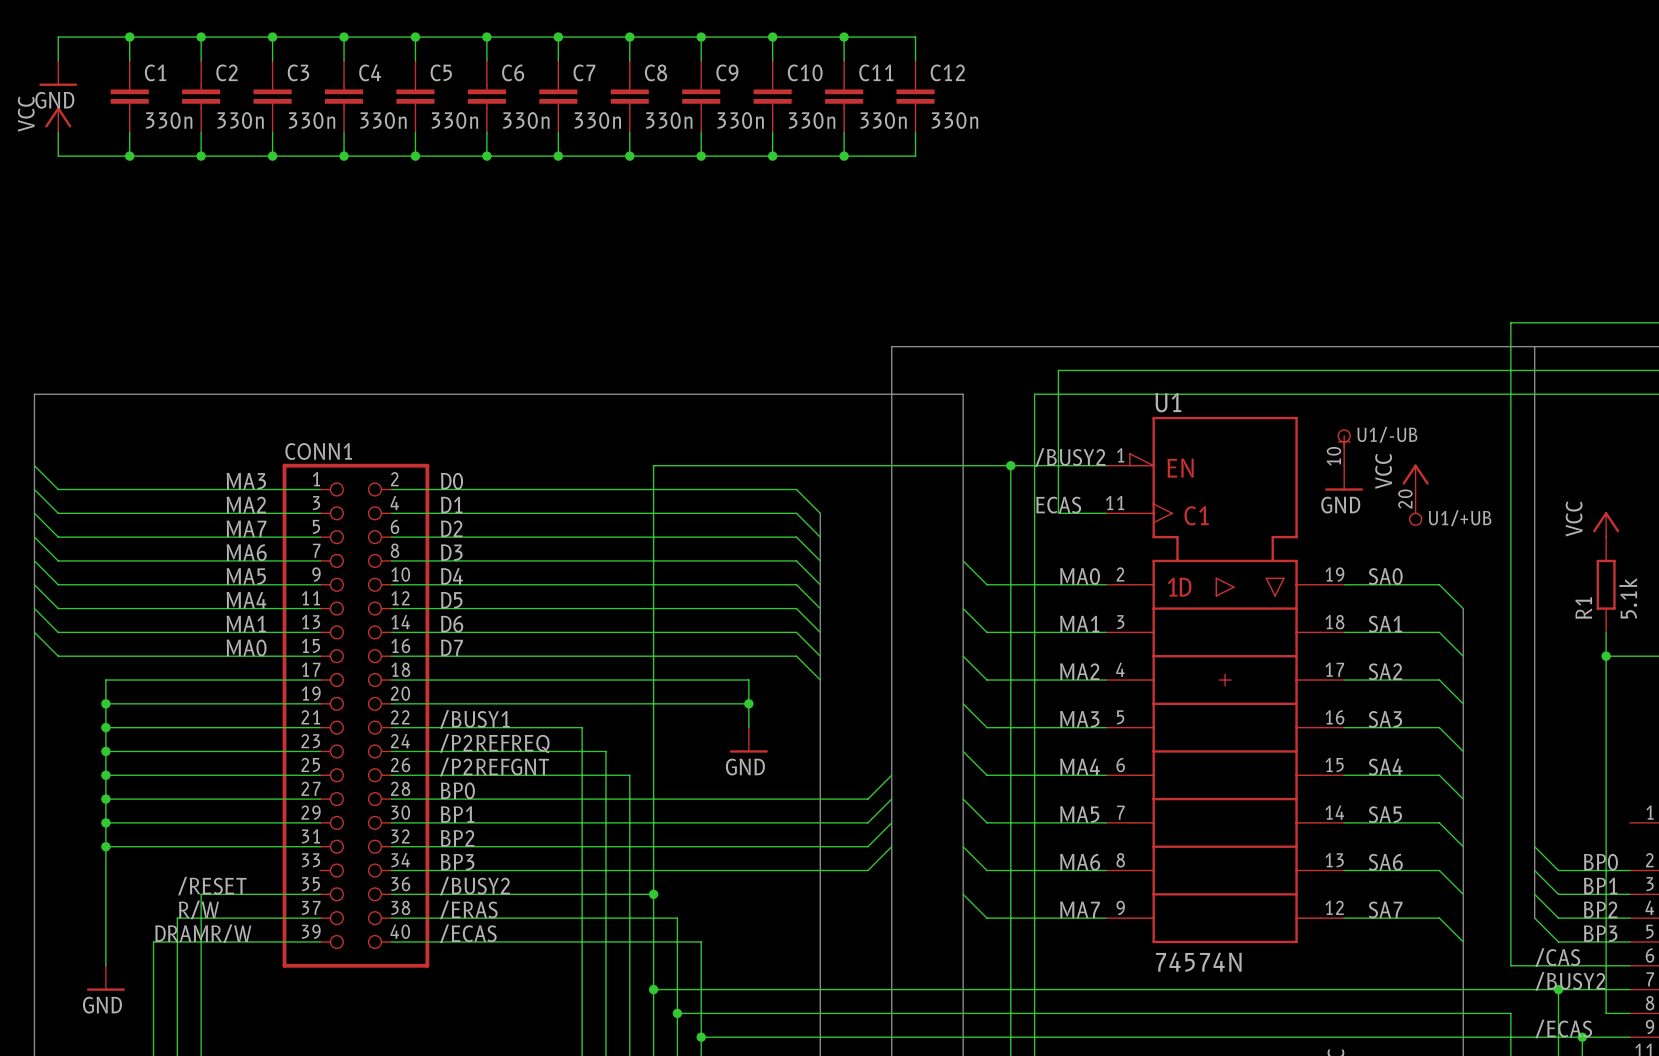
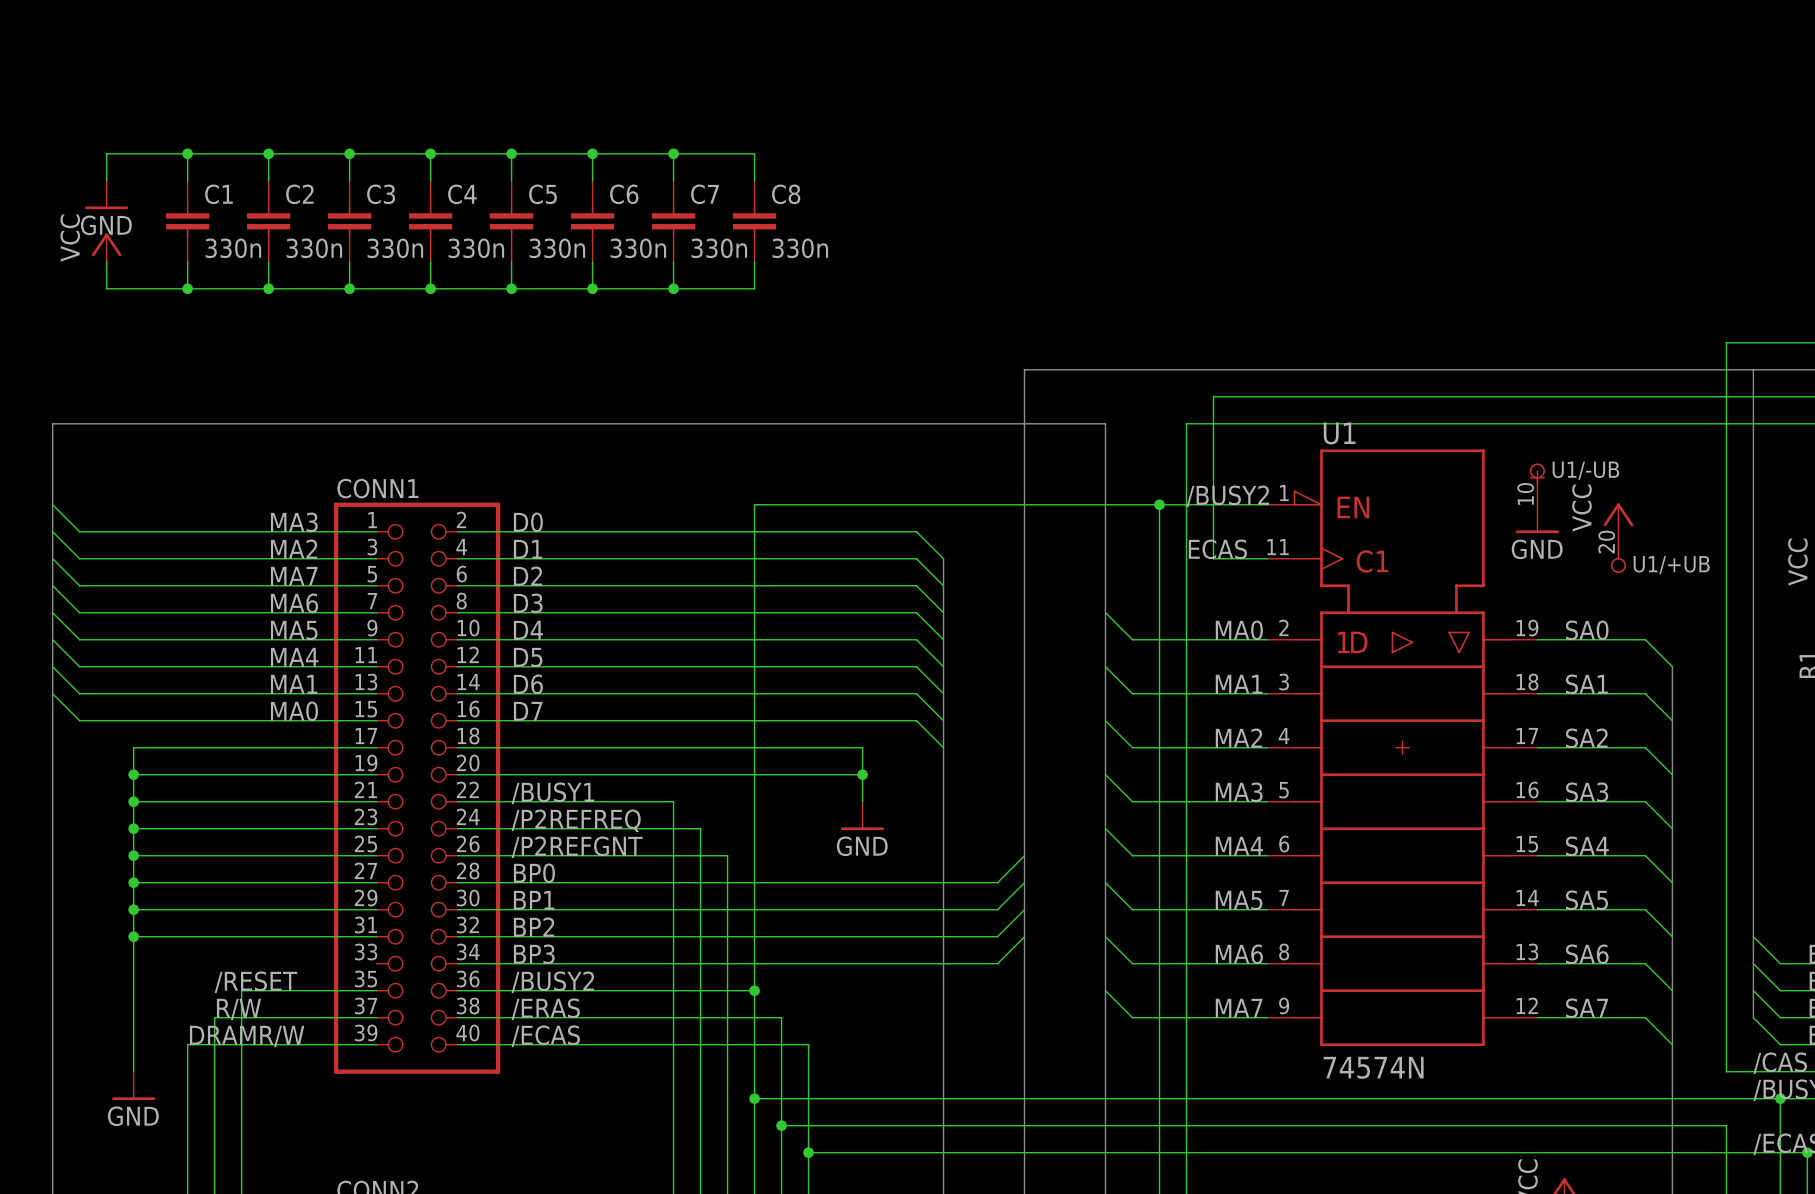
wire: (129, 37) (129, 60) -> none
junction: (129, 37) -> none
wire: (201, 37) (201, 60) -> (187, 153) (187, 180)
junction: (201, 37) -> none
wire: (272, 37) (272, 60) -> (268, 153) (268, 180)
junction: (272, 37) -> none
wire: (344, 37) (344, 60) -> (349, 153) (349, 180)
junction: (344, 37) -> none
wire: (415, 37) (415, 60) -> (430, 153) (430, 180)
junction: (415, 37) -> none
wire: (486, 37) (486, 60) -> (511, 153) (511, 180)
junction: (486, 37) -> none
wire: (558, 37) (558, 60) -> (592, 153) (592, 180)
junction: (558, 37) -> none
wire: (629, 37) (629, 60) -> (673, 153) (673, 180)
junction: (629, 37) -> none
wire: (701, 37) (701, 60) -> none
junction: (701, 37) -> none
wire: (772, 37) (772, 60) -> none
junction: (772, 37) -> none
wire: (844, 37) (844, 60) -> none
junction: (844, 37) -> none
wire: (58, 60) (58, 37) (915, 37) (915, 60) -> none
power symbol position: GND (58, 73) -> GND (106, 194)
C1 position: (129, 96) -> (187, 221)
C2 position: (201, 96) -> (268, 221)
C3 position: (272, 96) -> (349, 221)
C4 position: (344, 96) -> (430, 221)
C5 position: (415, 96) -> (511, 221)
C6 position: (486, 96) -> (592, 221)
C7 position: (558, 96) -> (673, 221)
C8 position: (629, 96) -> (754, 221)
C9: 330n (701, 96) -> none
C10: 330n (772, 96) -> none
C11: 330n (844, 96) -> none
C12: 330n (915, 96) -> none
power symbol position: VCC (58, 119) -> VCC (106, 247)
wire: (58, 132) (58, 156) (82, 156) -> (106, 180) (106, 153)
wire: (129, 132) (129, 156) -> none
wire: (201, 132) (201, 156) -> (187, 261) (187, 288)
wire: (272, 132) (272, 156) -> (268, 261) (268, 288)
wire: (344, 132) (344, 156) -> (349, 261) (349, 288)
wire: (415, 132) (415, 156) -> (430, 261) (430, 288)
wire: (486, 132) (486, 156) -> (511, 261) (511, 288)
wire: (558, 132) (558, 156) -> (592, 261) (592, 288)
wire: (629, 132) (629, 156) -> (673, 261) (673, 288)
wire: (701, 132) (701, 156) -> none
wire: (772, 132) (772, 156) -> none
wire: (844, 132) (844, 156) -> none
wire: (915, 132) (915, 156) (653, 156) -> (754, 180) (754, 153)
junction: (129, 156) -> none
junction: none -> (187, 153)
junction: (201, 156) -> none
junction: none -> (268, 153)
junction: (272, 156) -> none
junction: none -> (349, 153)
junction: (344, 156) -> none
junction: none -> (430, 153)
junction: (415, 156) -> none
junction: none -> (511, 153)
junction: (486, 156) -> none
junction: none -> (592, 153)
junction: (558, 156) -> none
junction: none -> (673, 153)
junction: (629, 156) -> none
junction: (701, 156) -> none
junction: (772, 156) -> none
junction: (844, 156) -> none
wire: none -> (106, 261) (106, 288) (754, 288) (754, 261)
junction: none -> (187, 288)
junction: none -> (268, 288)
junction: none -> (349, 288)
junction: none -> (430, 288)
junction: none -> (511, 288)
junction: none -> (592, 288)
junction: none -> (673, 288)

